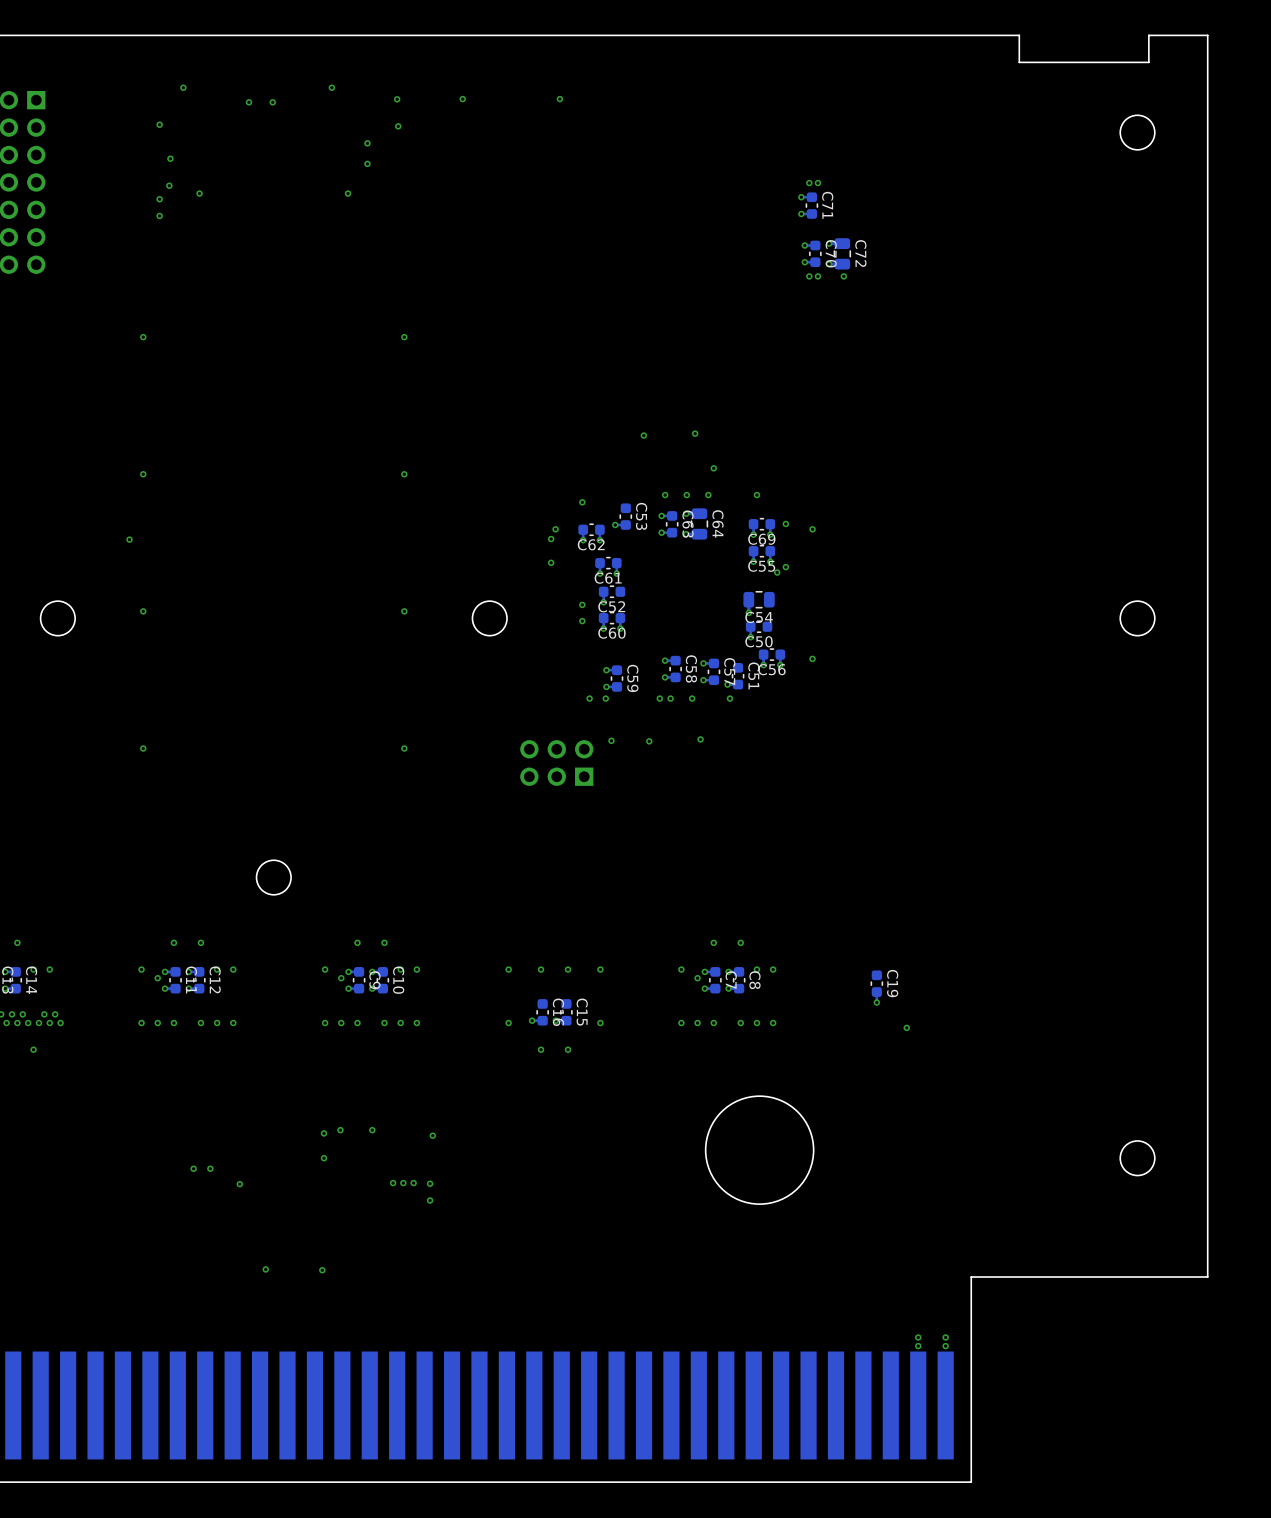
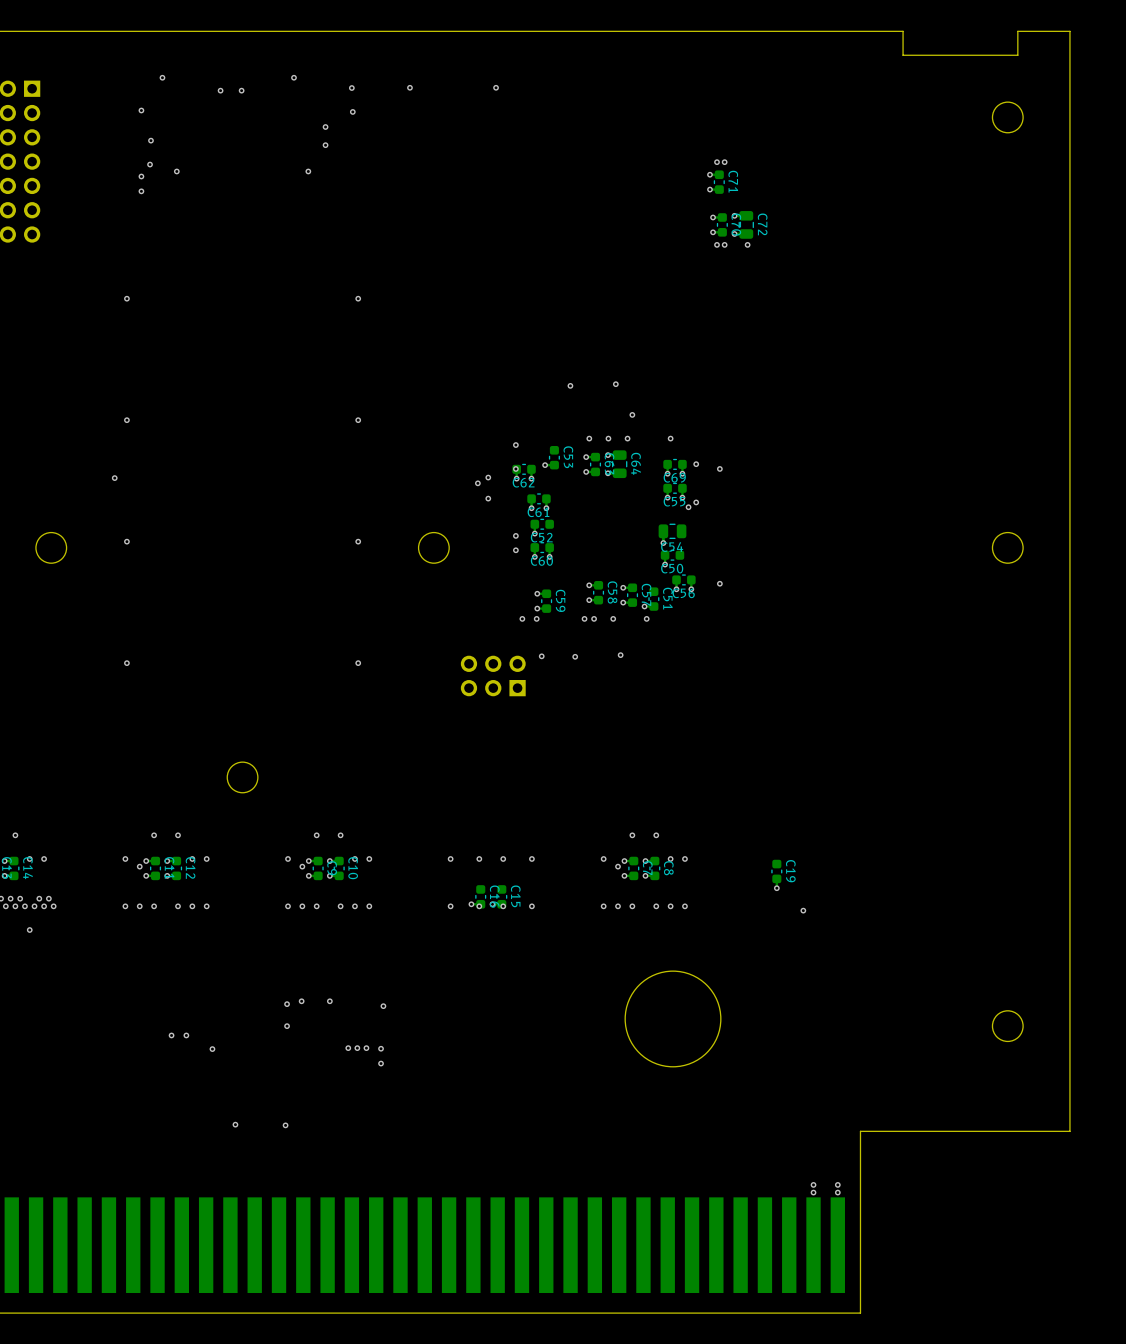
via: (555, 529) -> none
via: none -> (515, 468)
via: none -> (477, 483)
via: none -> (479, 906)
via: none -> (503, 906)
via: (541, 1049) -> none
via: (568, 1049) -> none

